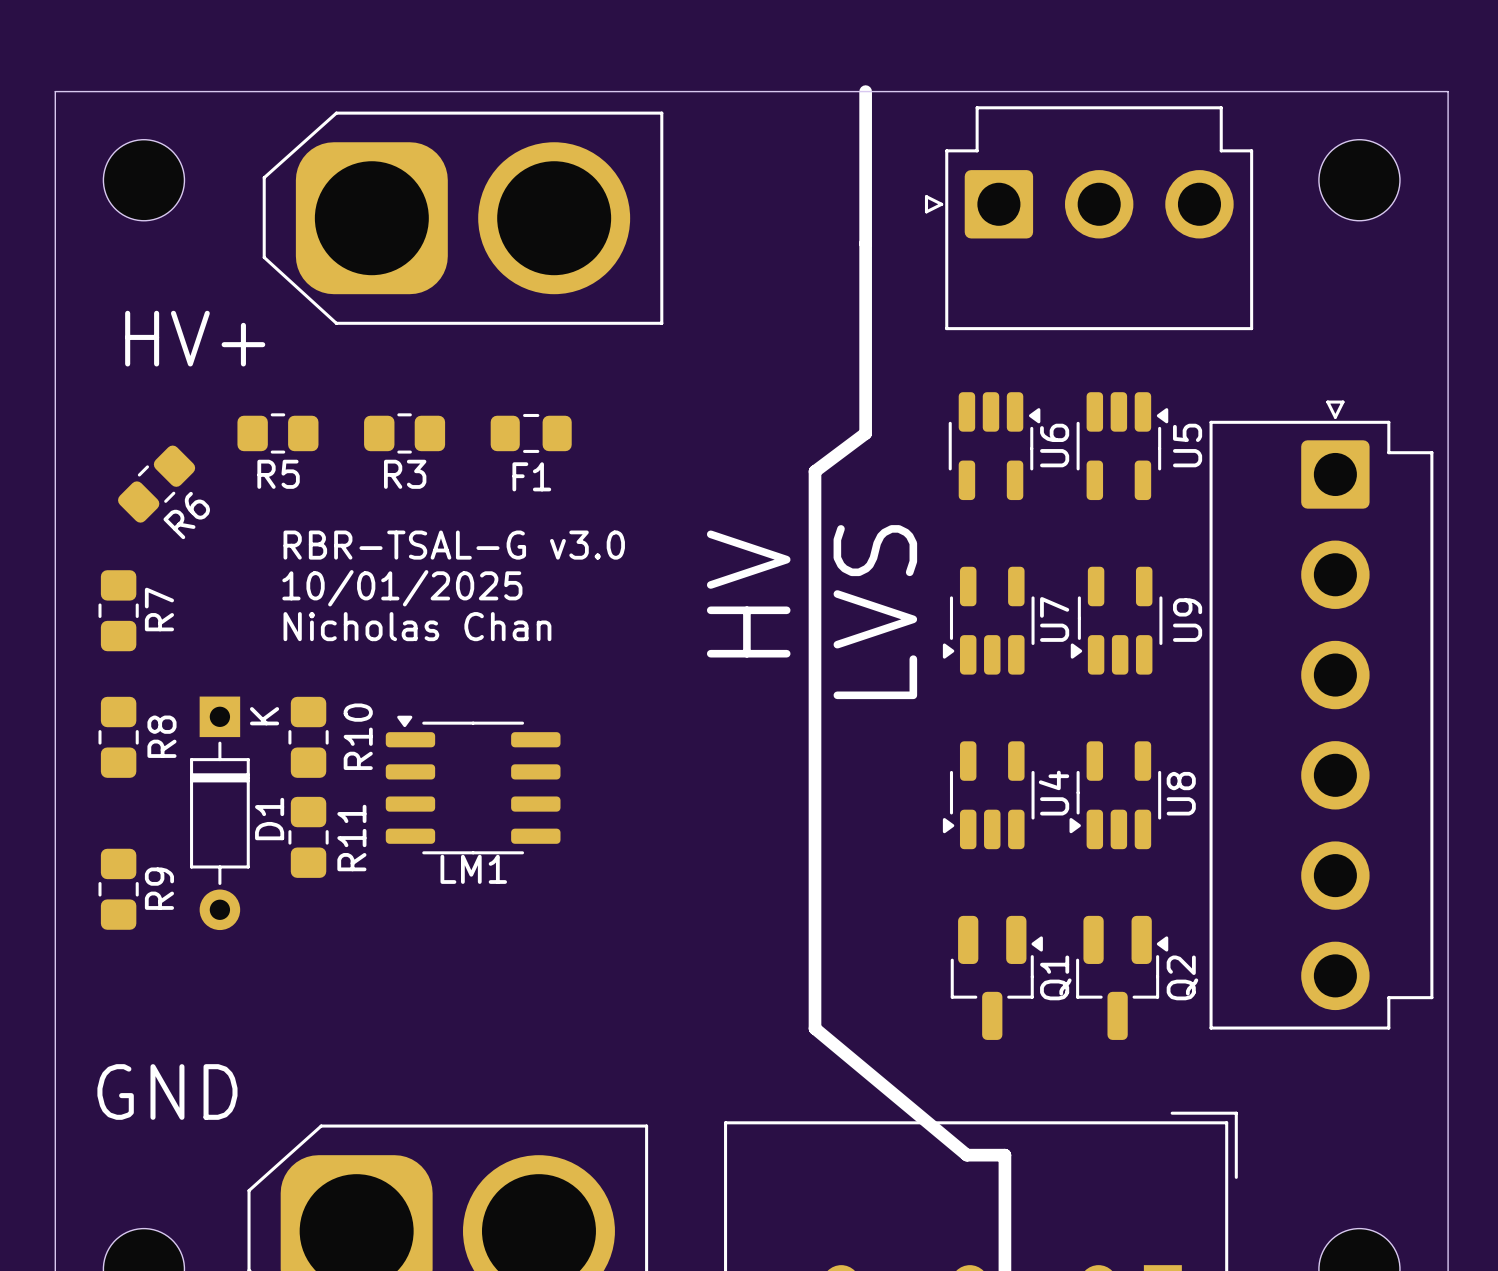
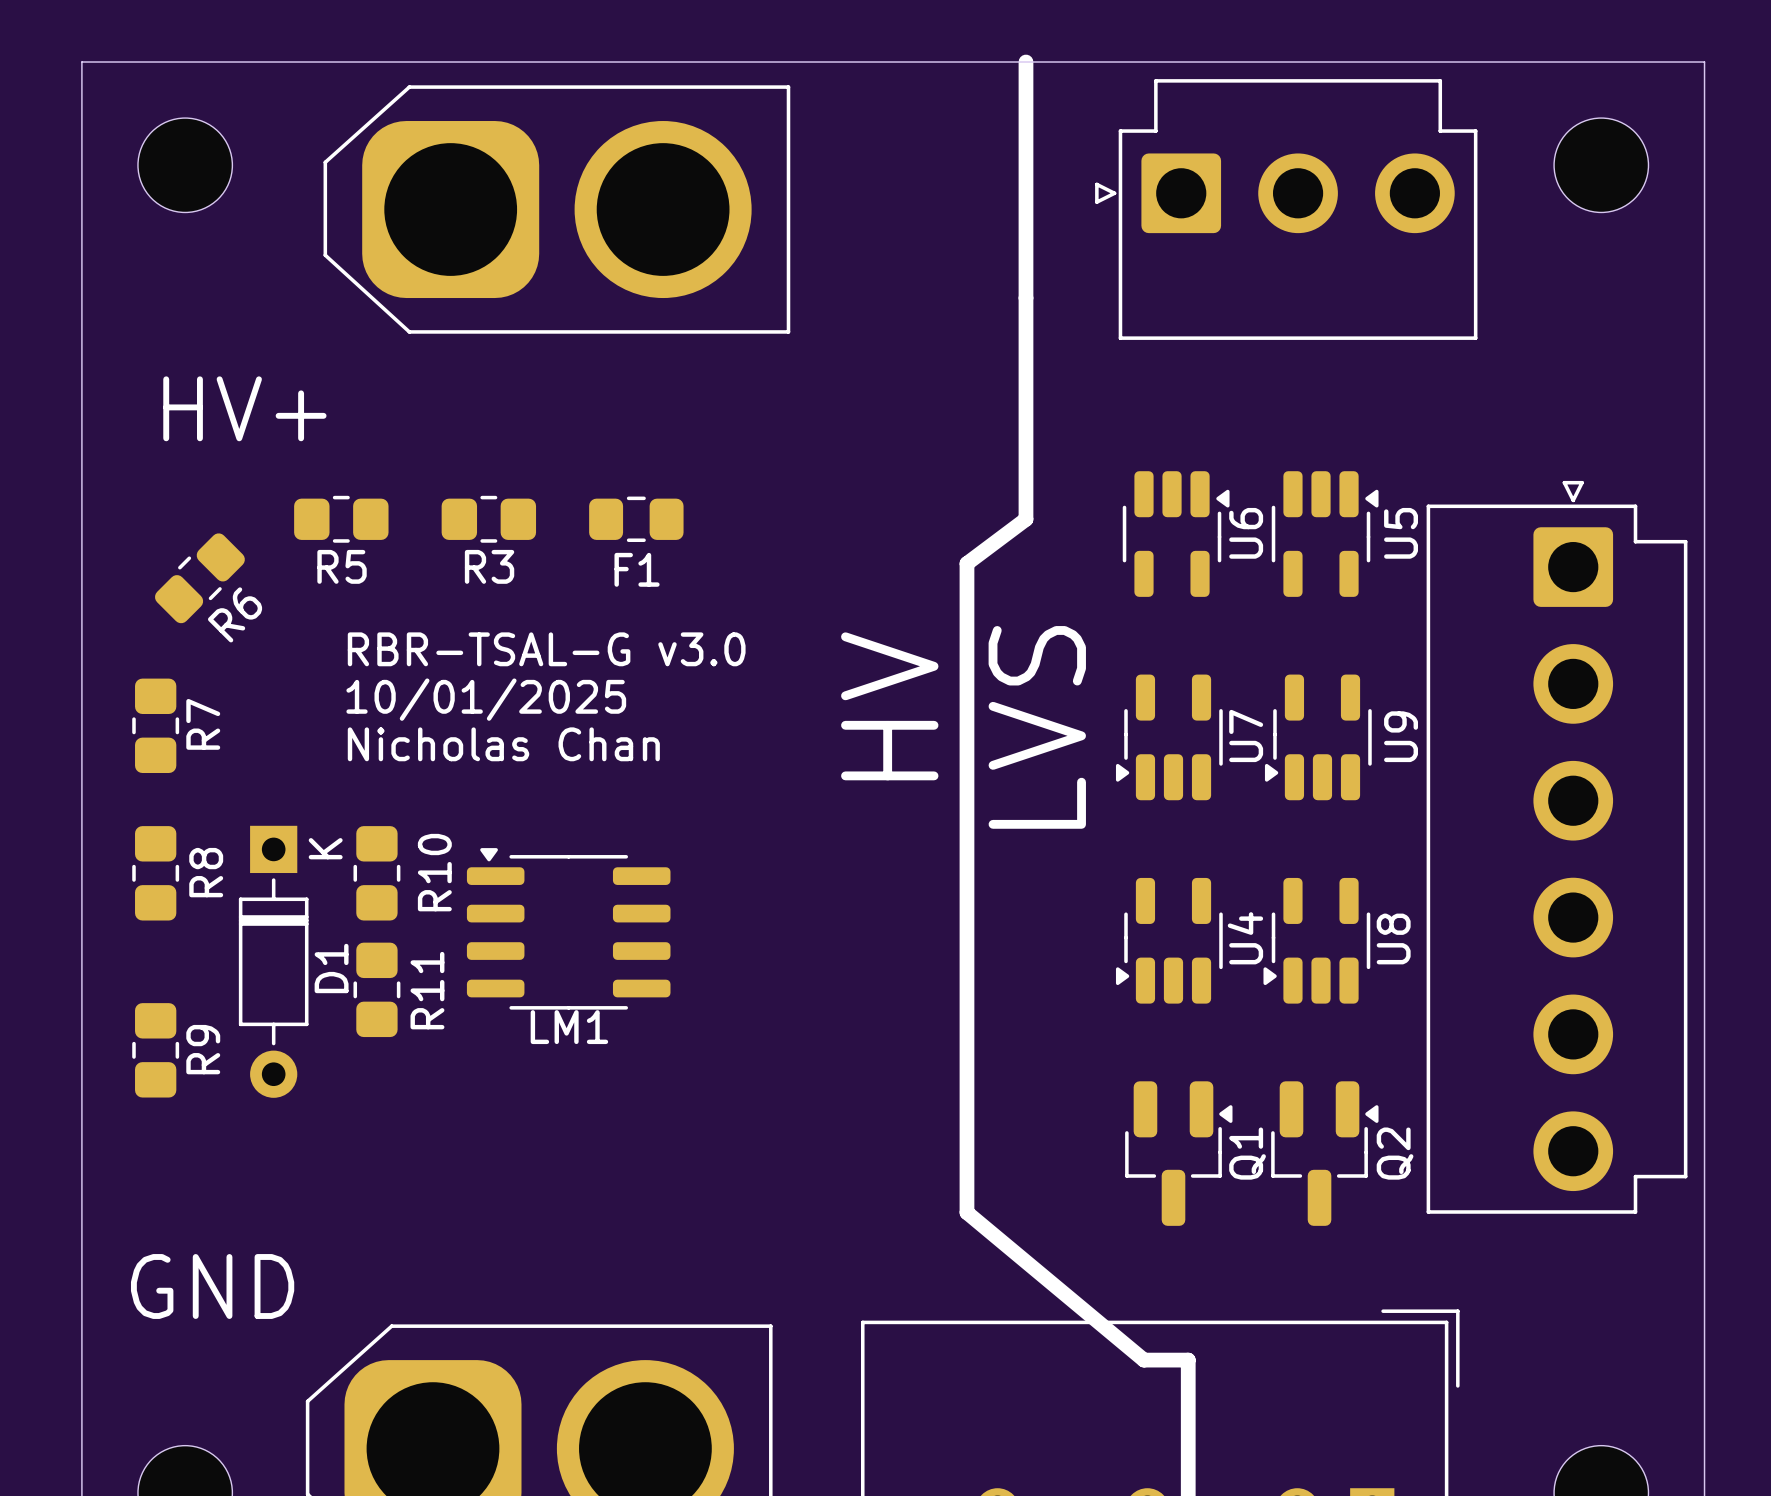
line: none -> (1025, 62) (1025, 121)
board edge: (55, 91) (1448, 91) -> (81, 121) (81, 62) (1704, 62) (1704, 121)
part position: (143, 180) -> (185, 165)
part position: (1359, 180) -> (1601, 165)
part position: (463, 218) -> (556, 209)
part position: (1089, 218) -> (1286, 209)

